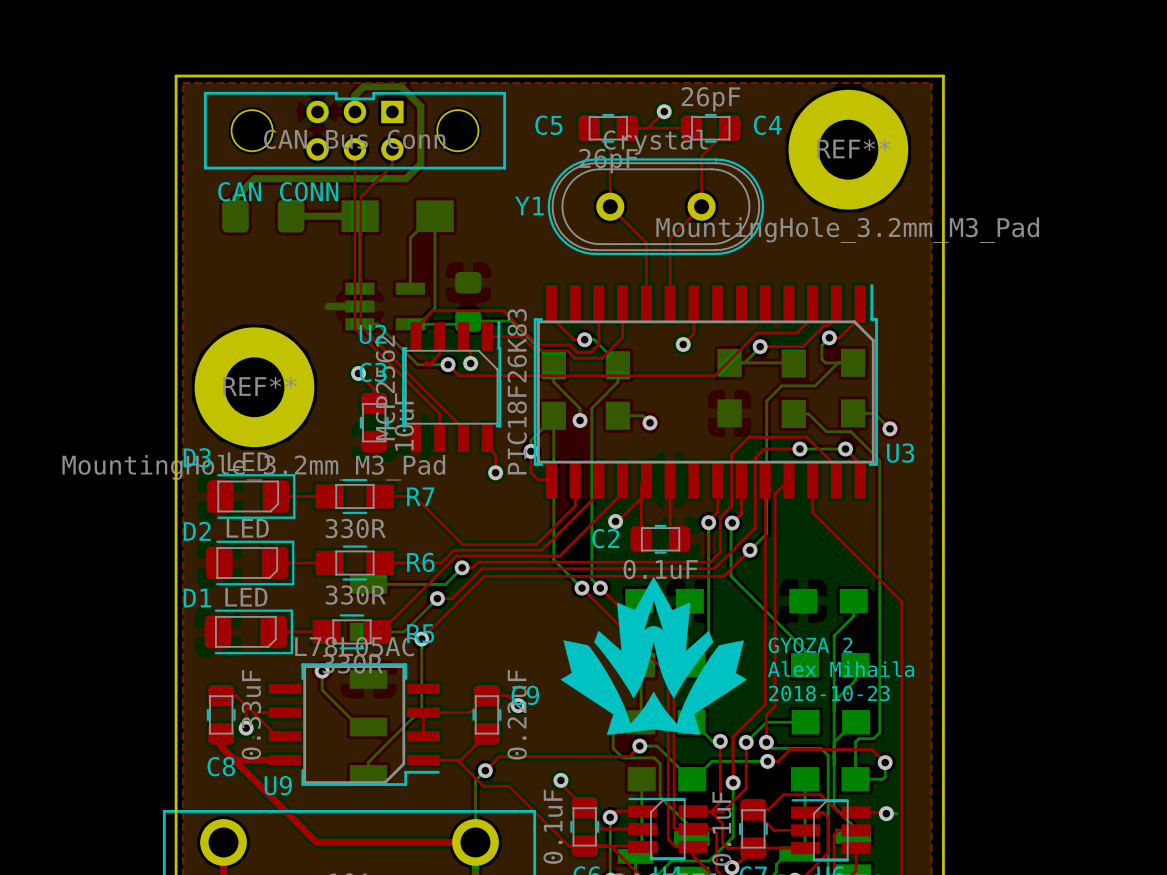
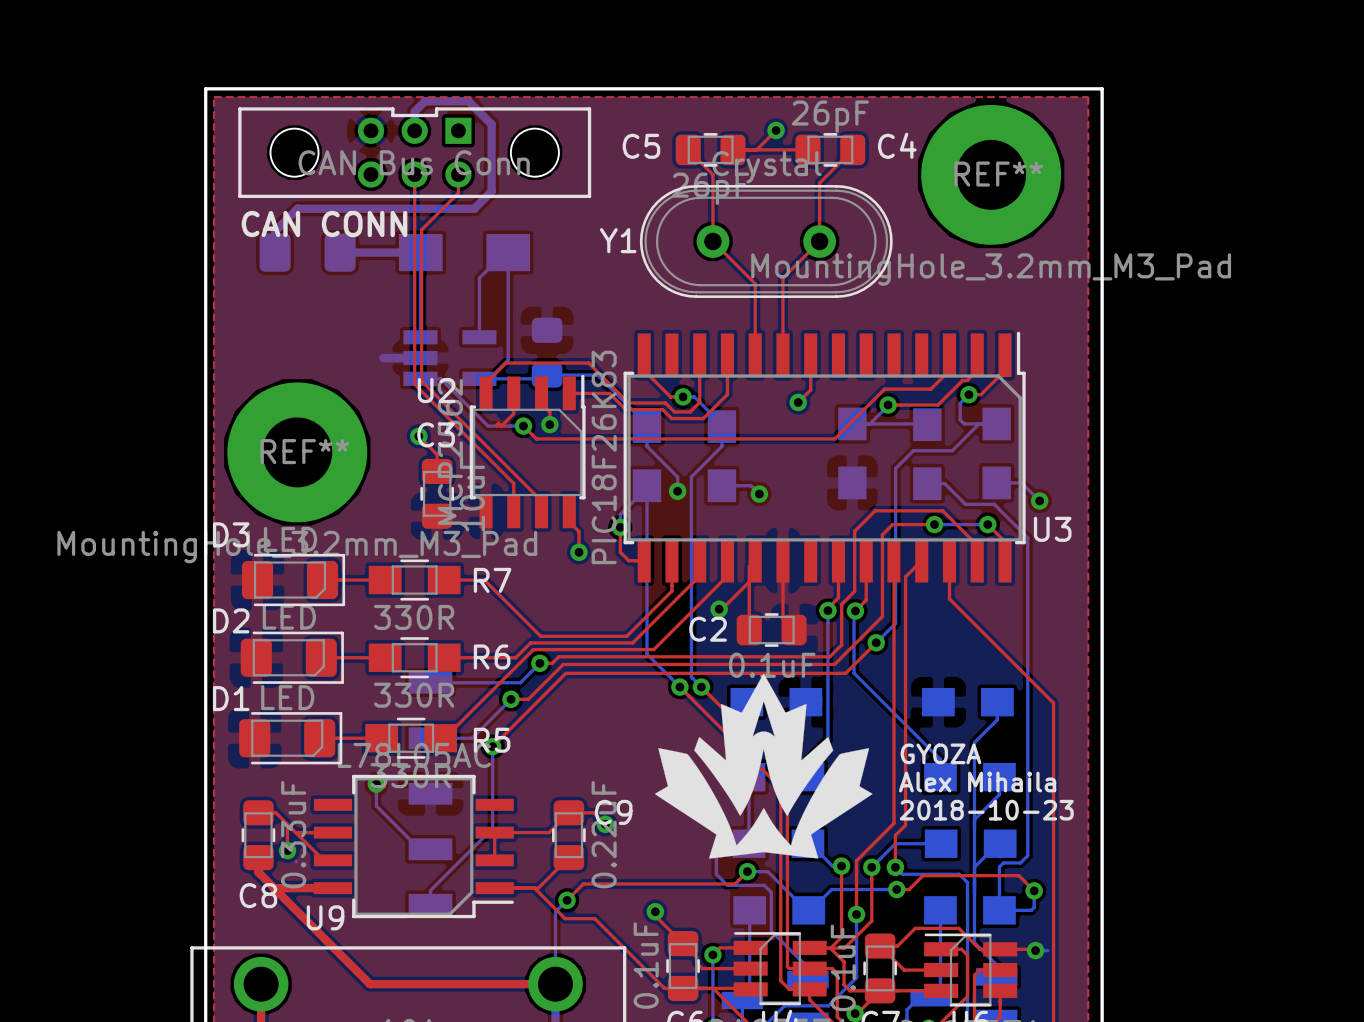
text: GYOZA 2 (810, 645) -> GYOZA (940, 753)

